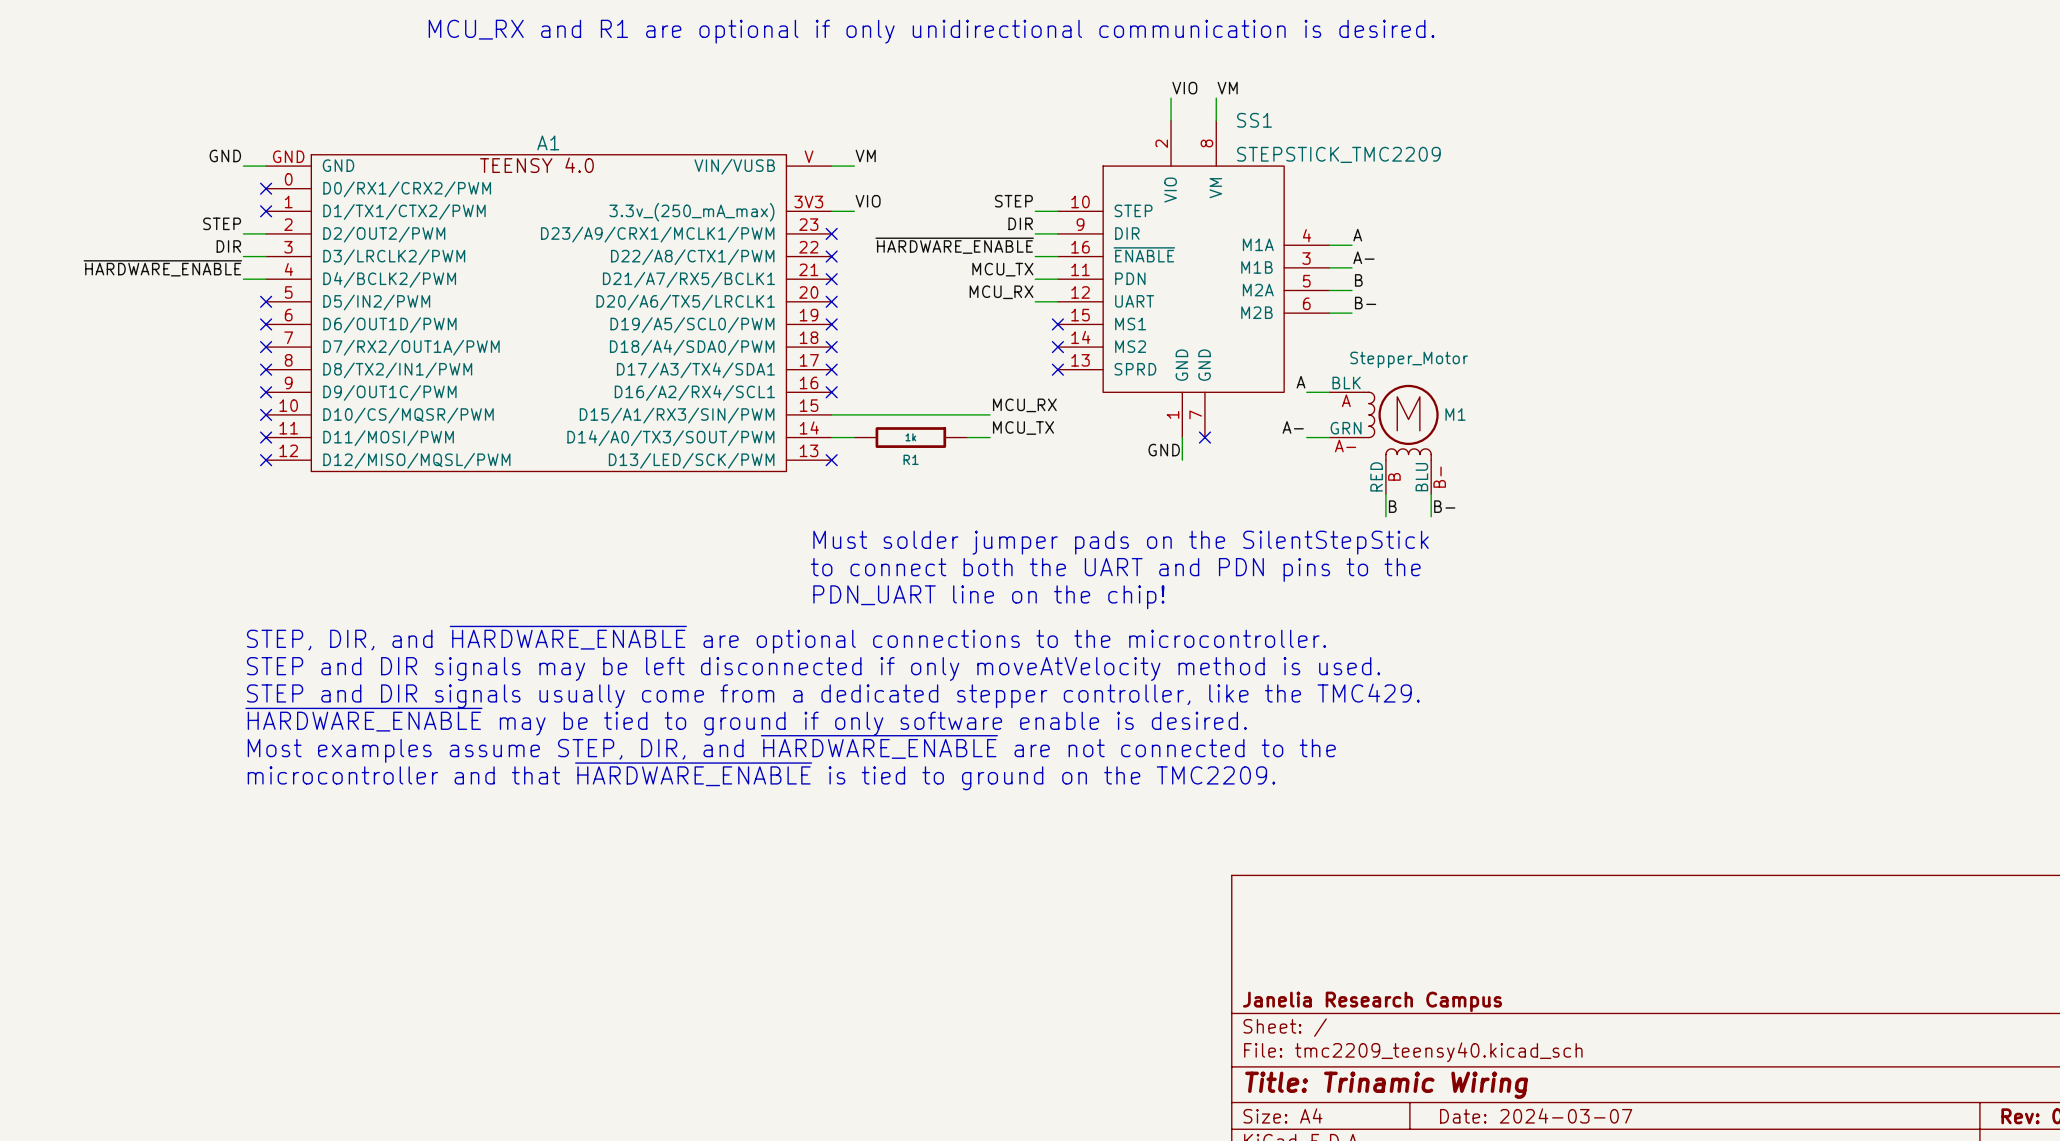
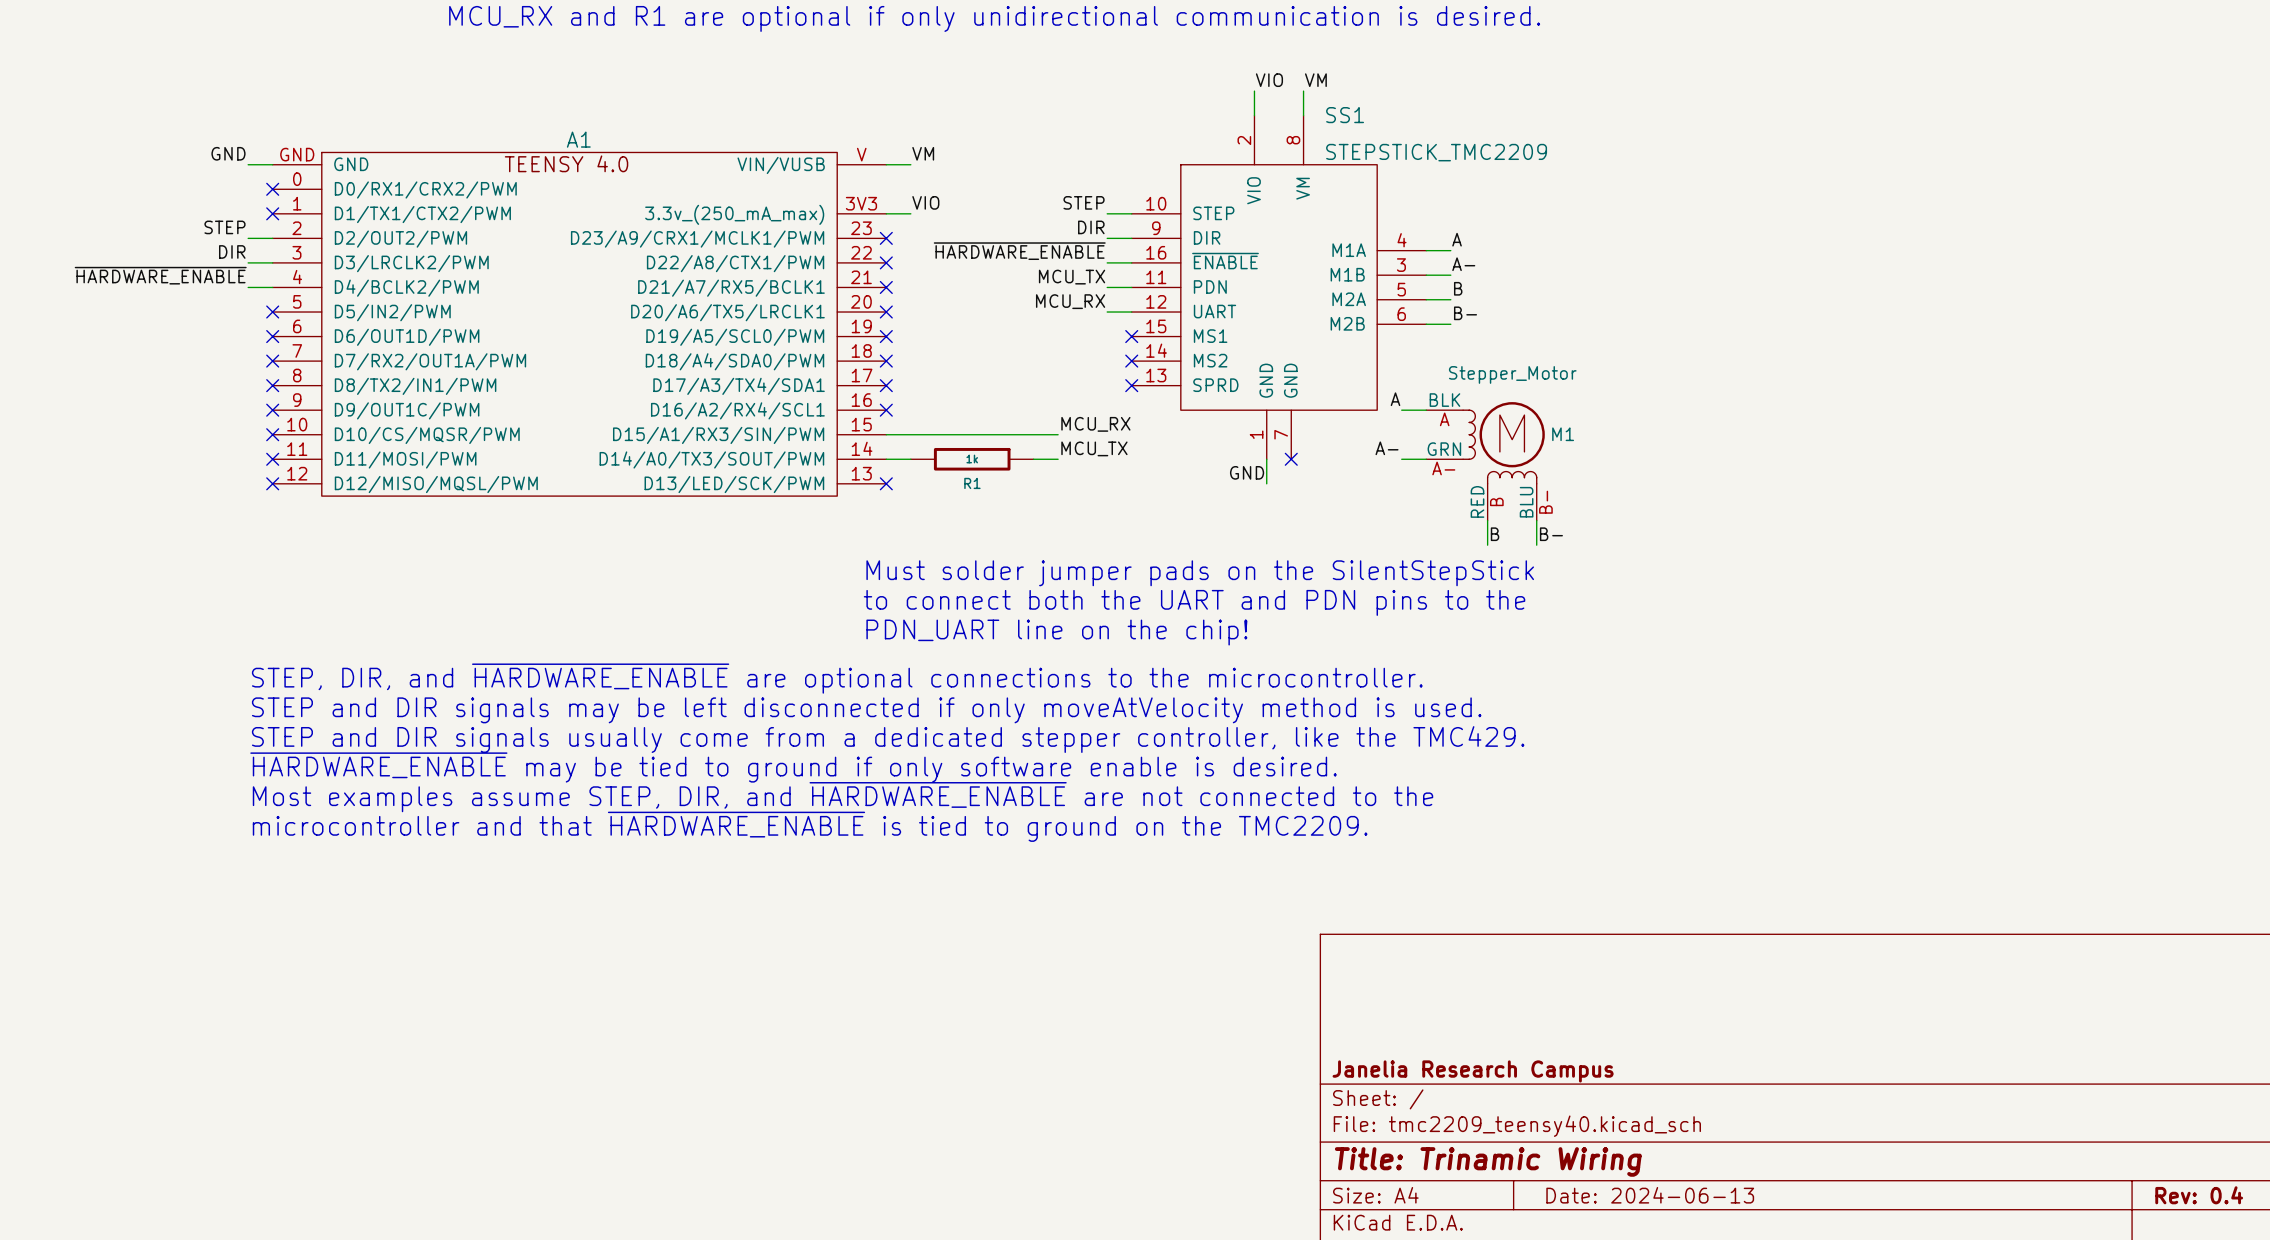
title block: Date: 2024-03-07 (1536, 1115) -> Date: 2024-06-13 (1650, 1195)

